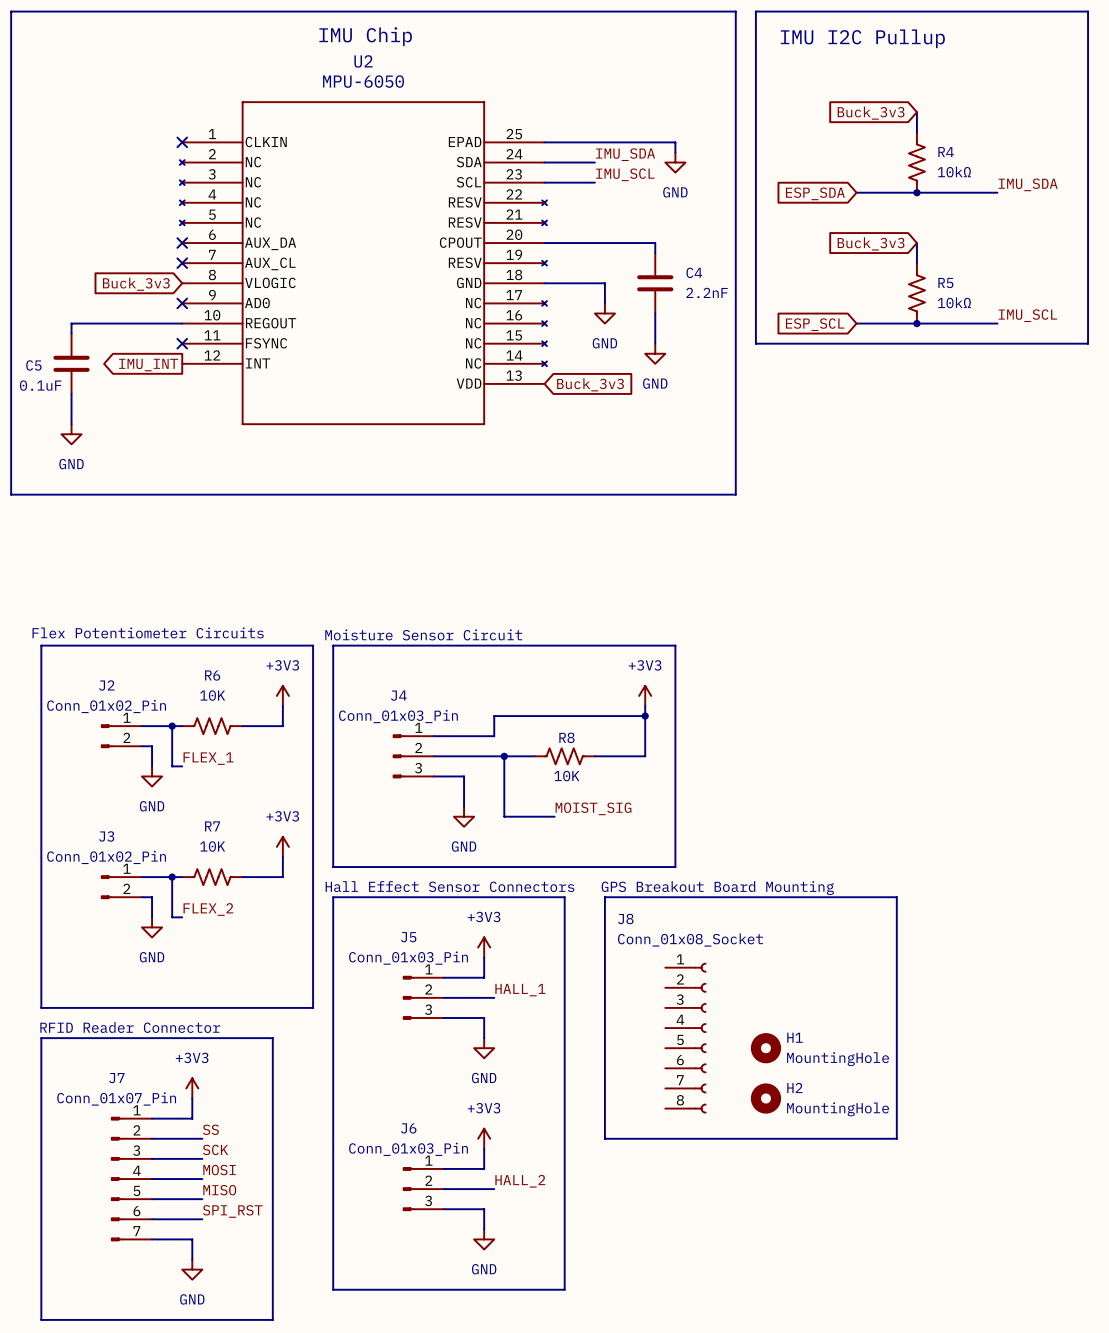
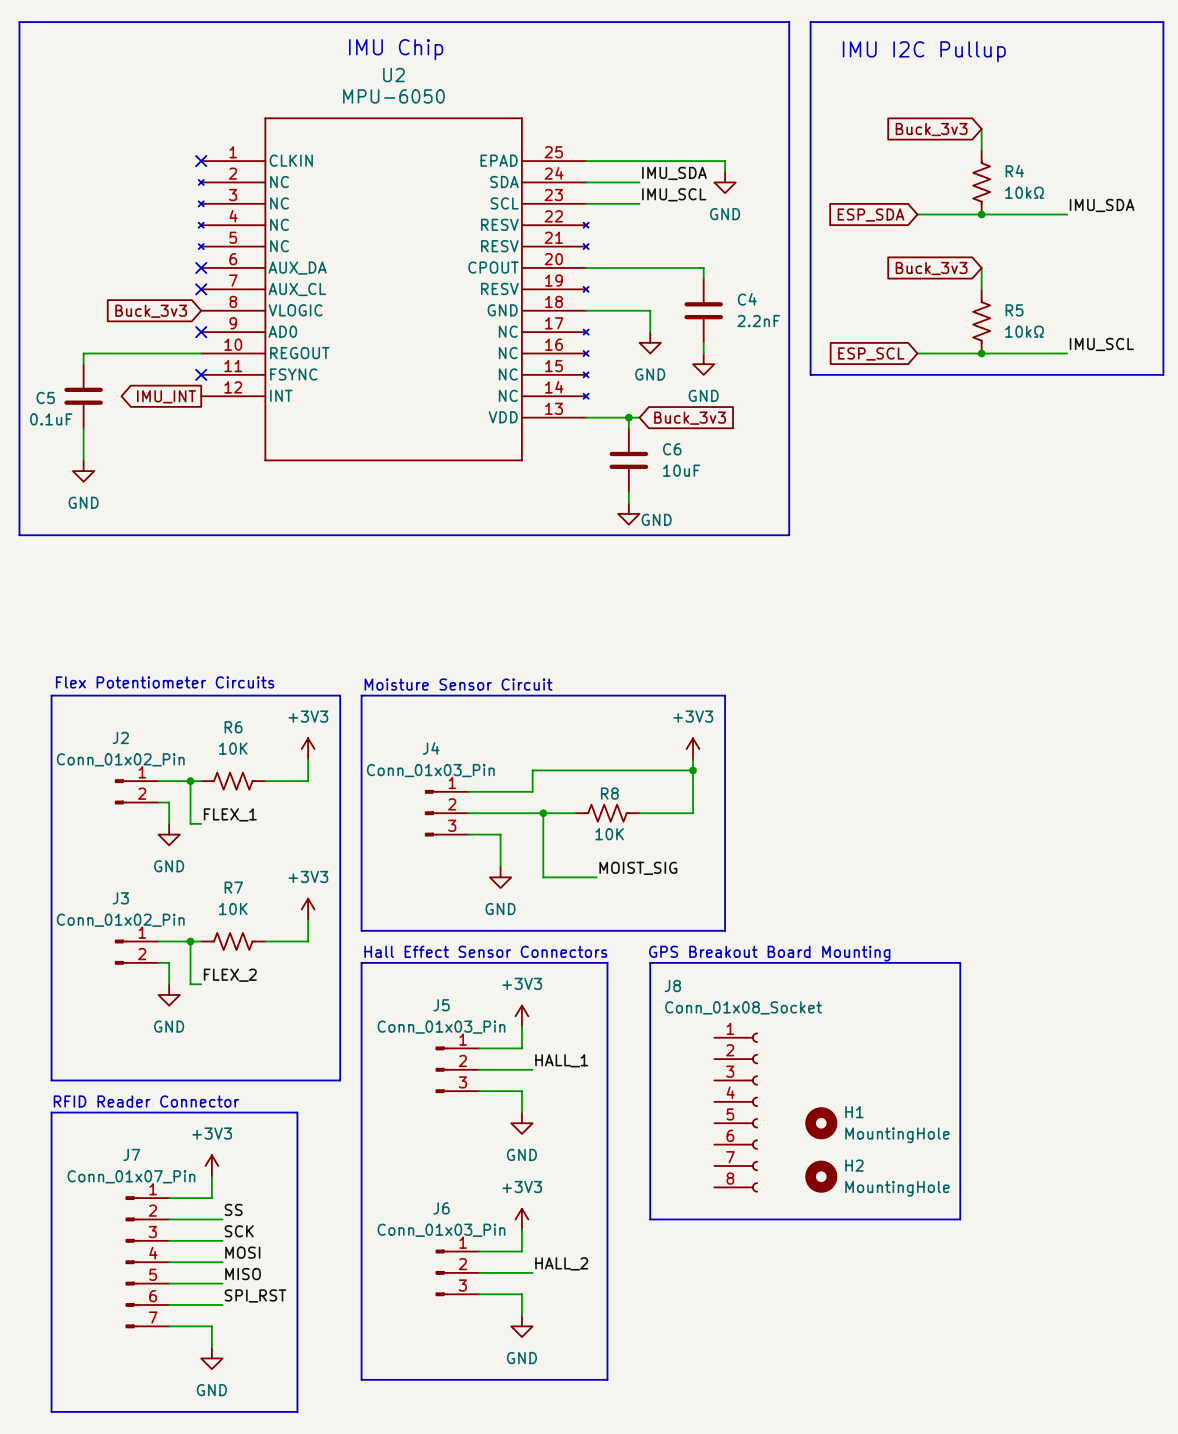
power symbol position: GND (655, 353) -> GND (703, 364)
wire: none -> (586, 417) (639, 417)
wire: none -> (628, 417) (628, 428)
junction: none -> (628, 417)
global label position: Buck_3v3 (590, 384) -> Buck_3v3 (690, 418)
C6: none -> 10uF (628, 460)
wire: none -> (628, 492) (628, 503)
power symbol: none -> GND (628, 513)

